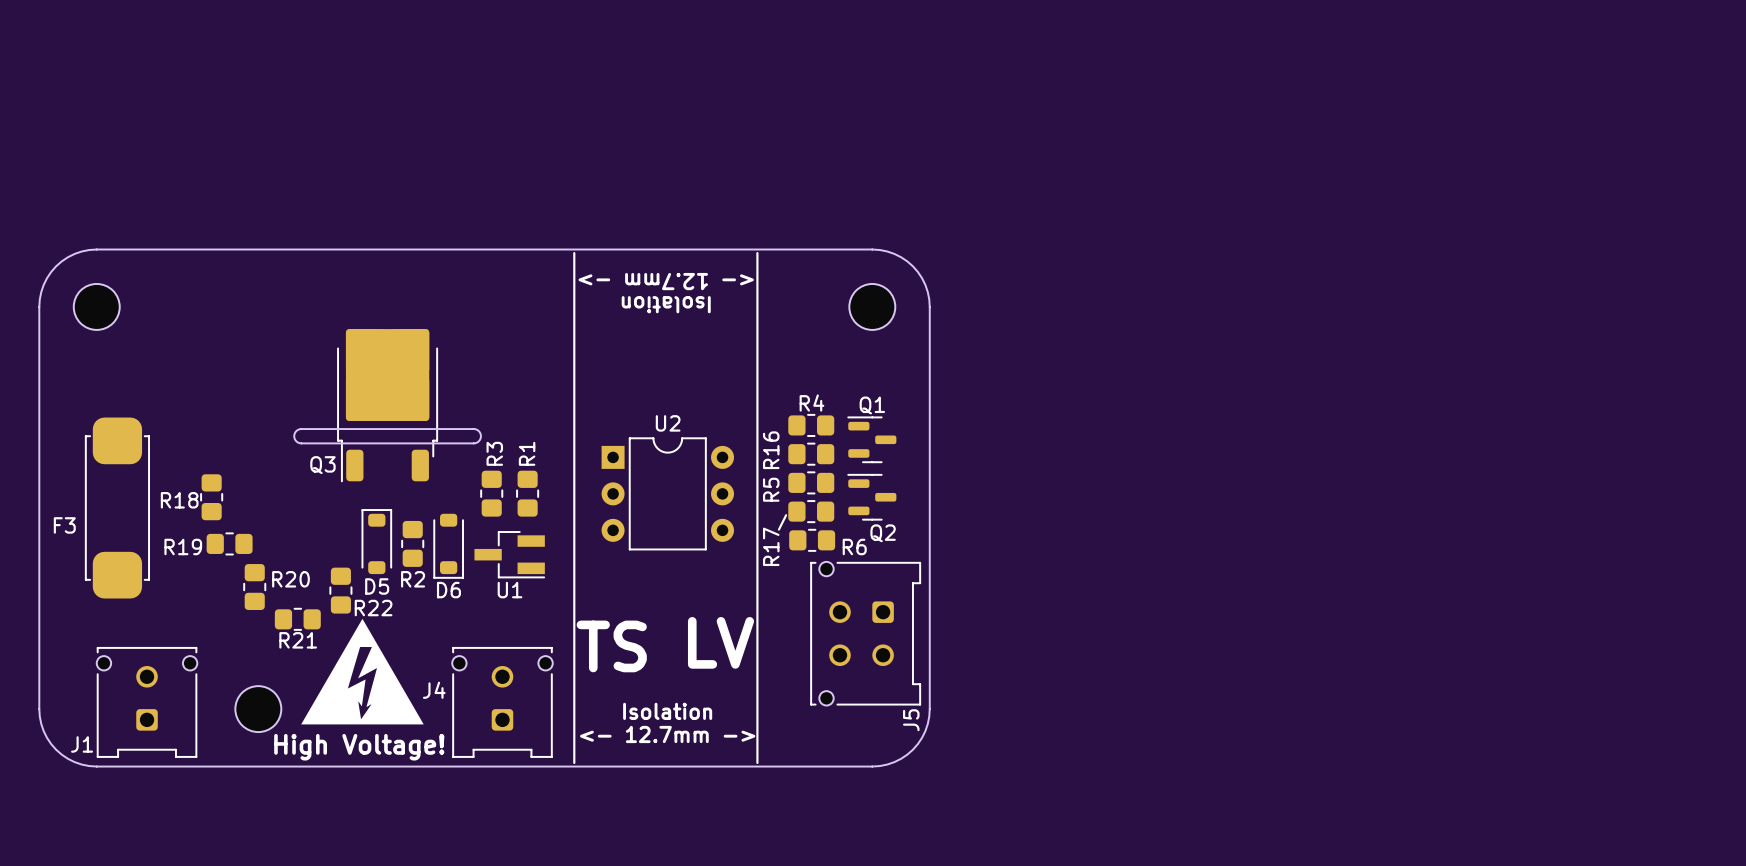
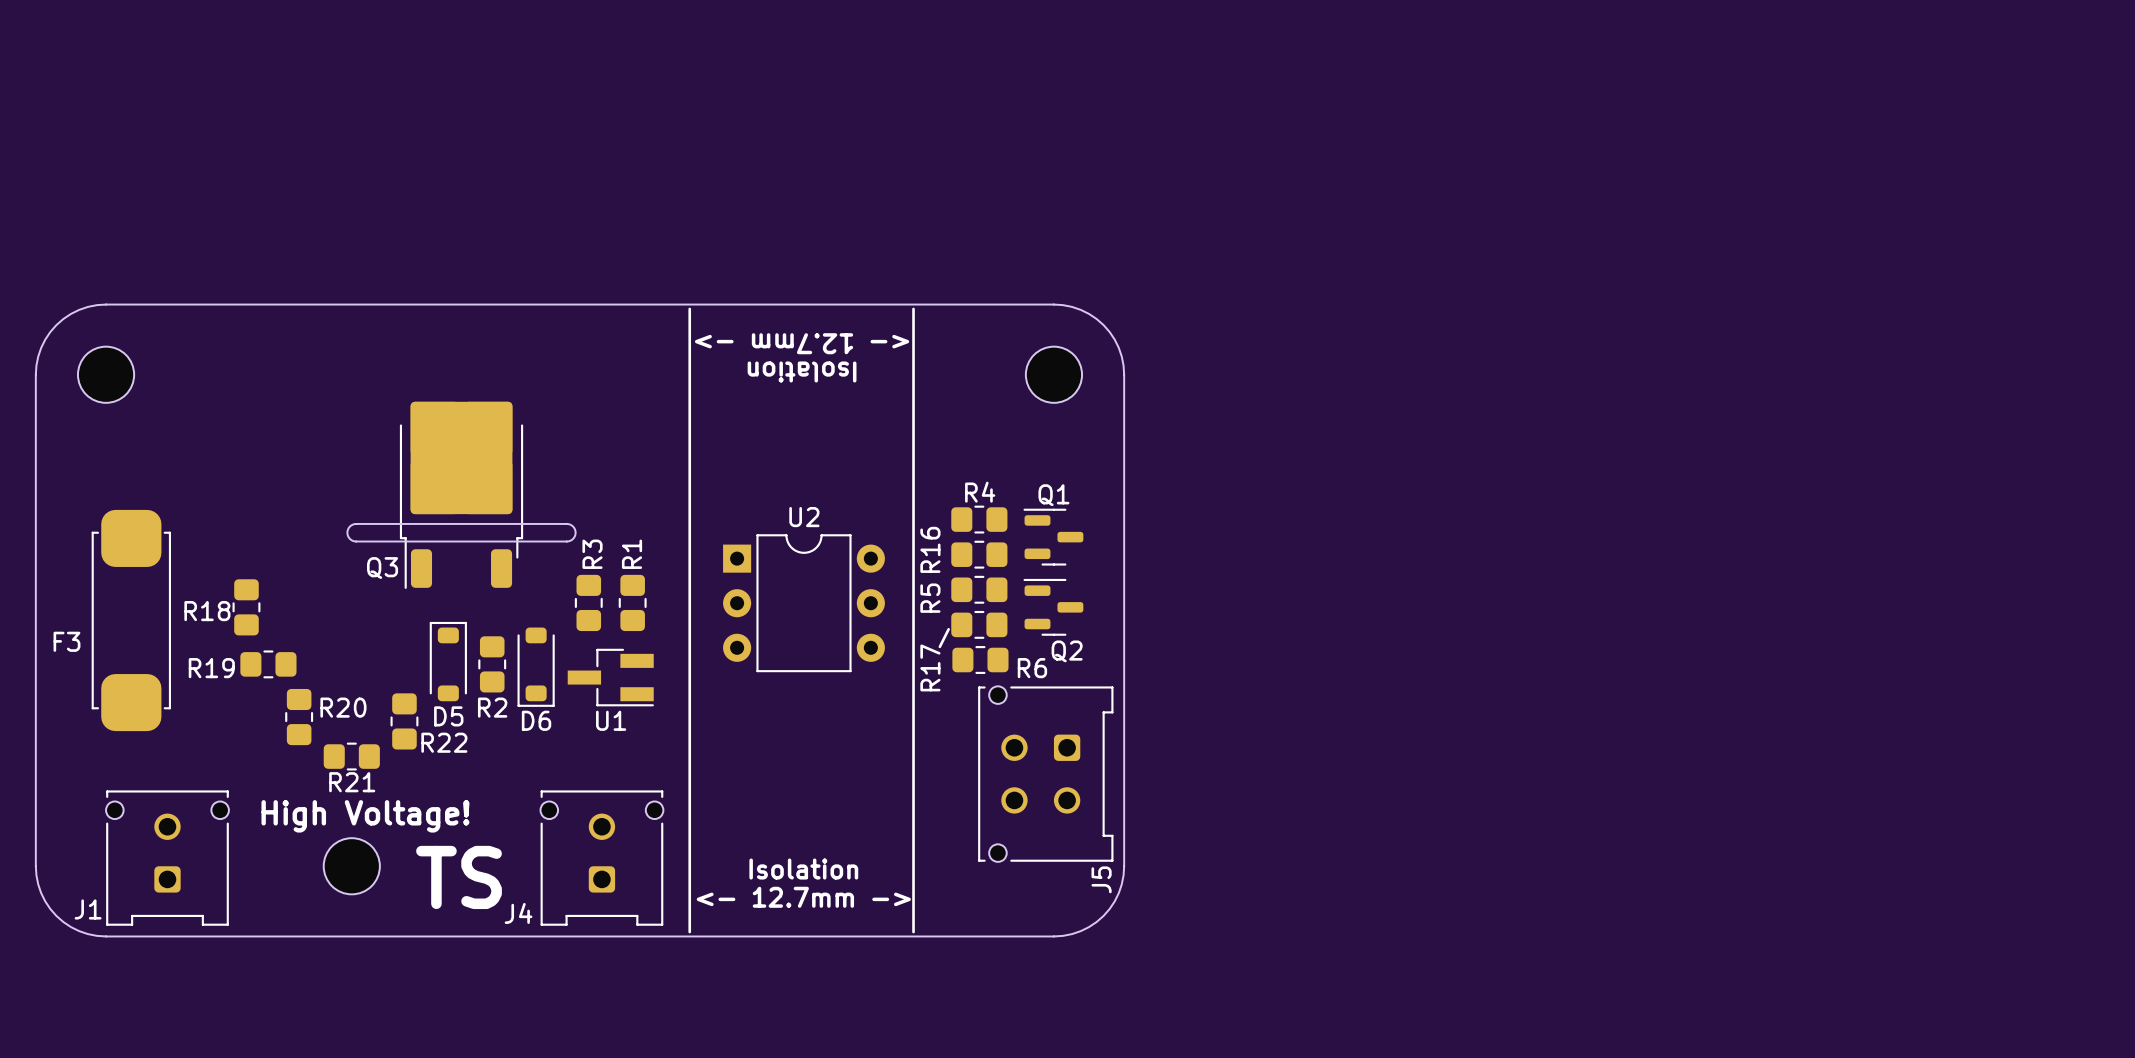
drawing: [301, 618, 424, 725] -> none
text: LV (721, 642) -> none
text position: TS (611, 646) -> TS (459, 877)
J4 name position: J4 (434, 690) -> J4 (518, 913)
part position: (258, 709) -> (351, 866)
text position: High Voltage! (359, 747) -> High Voltage! (365, 816)

